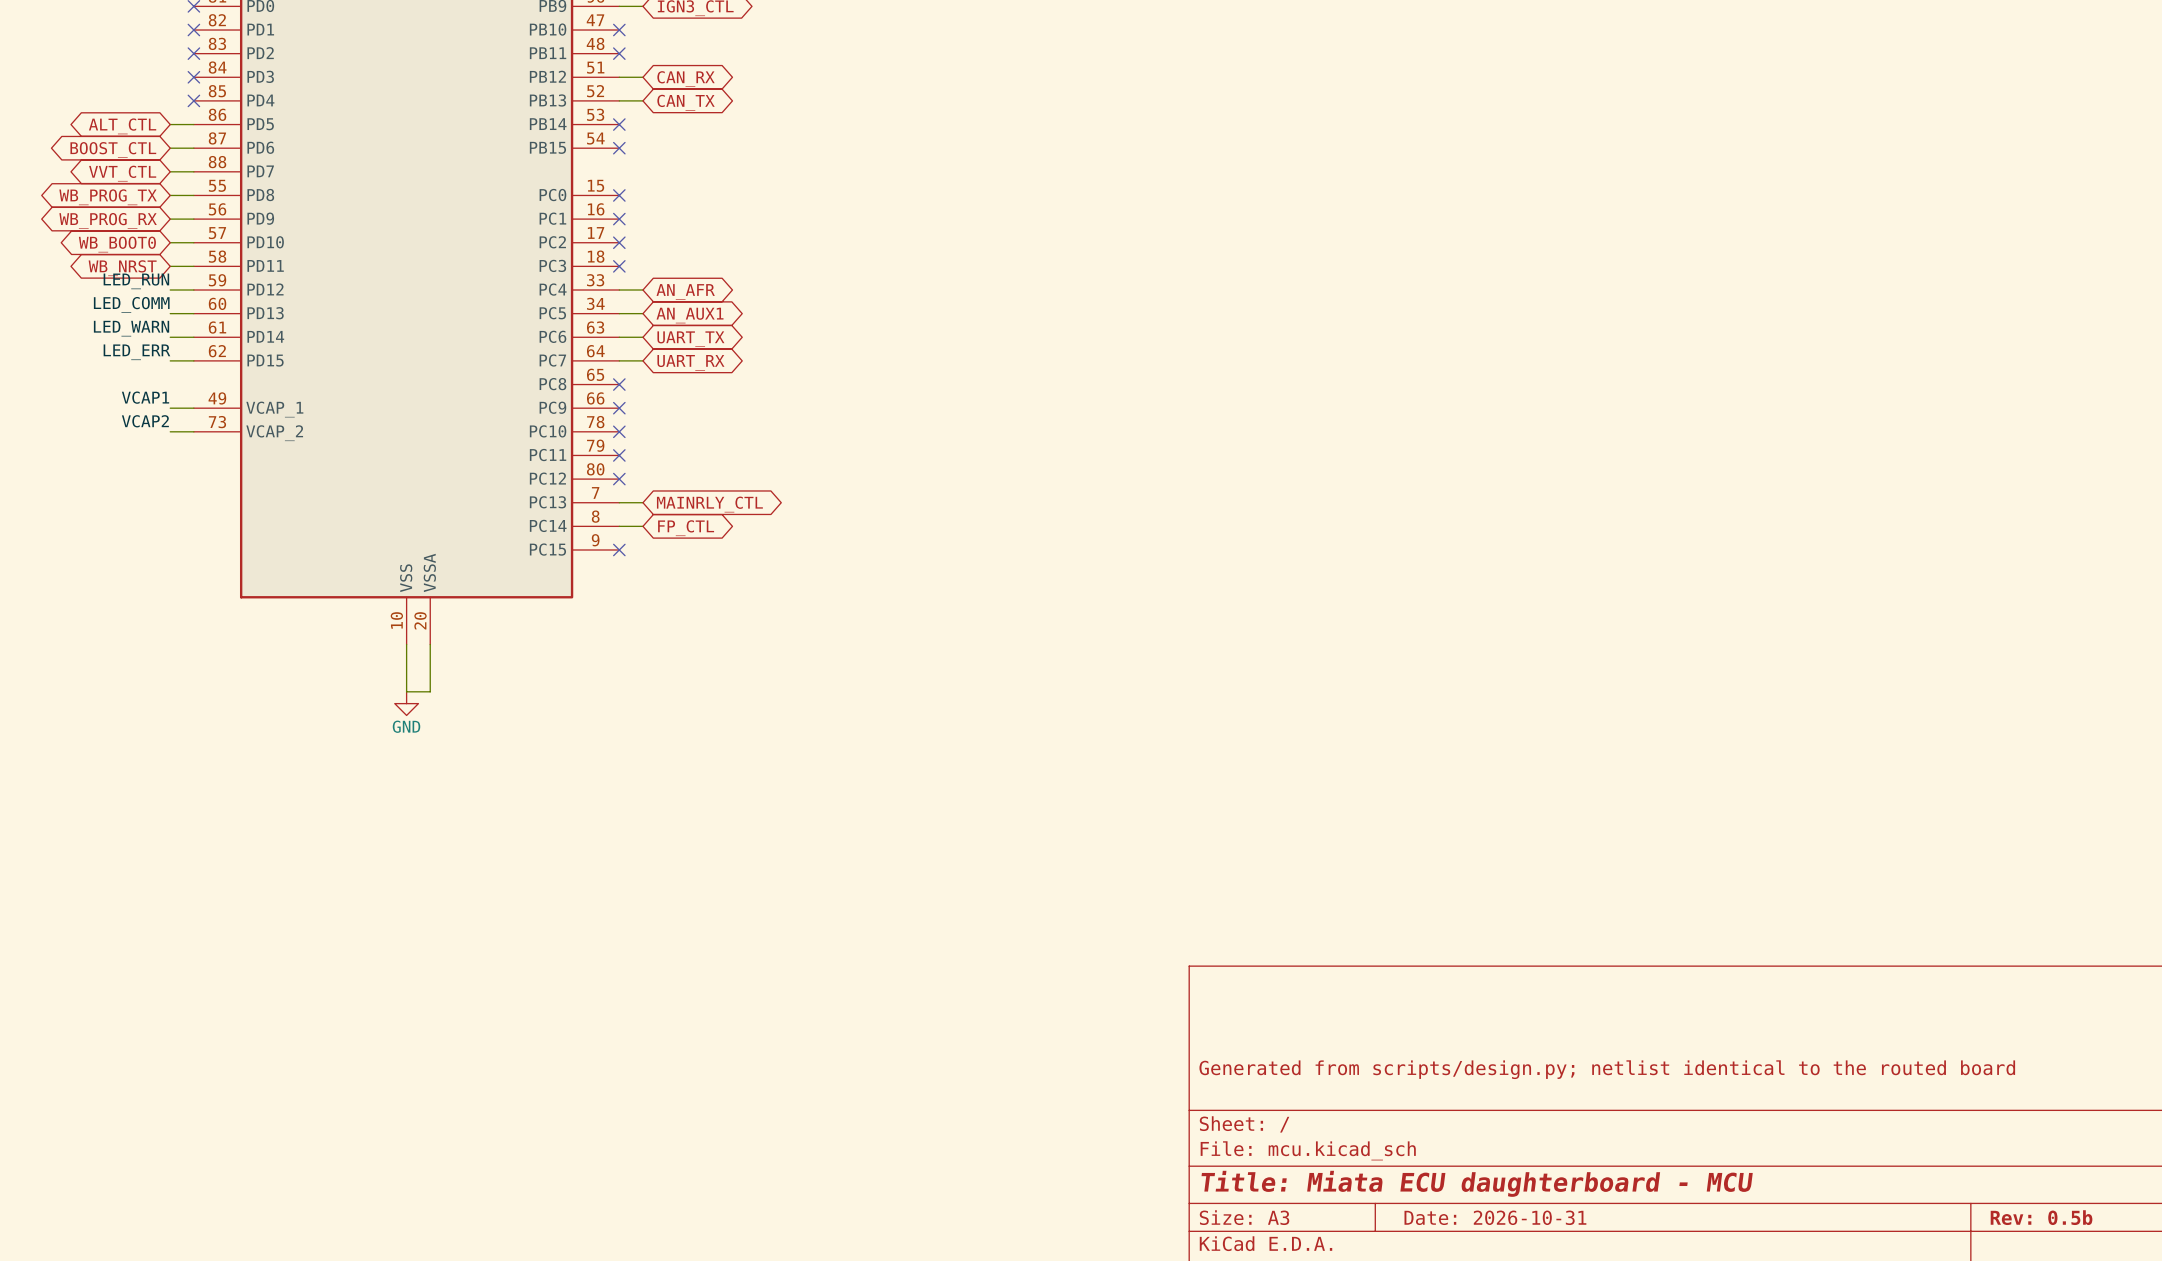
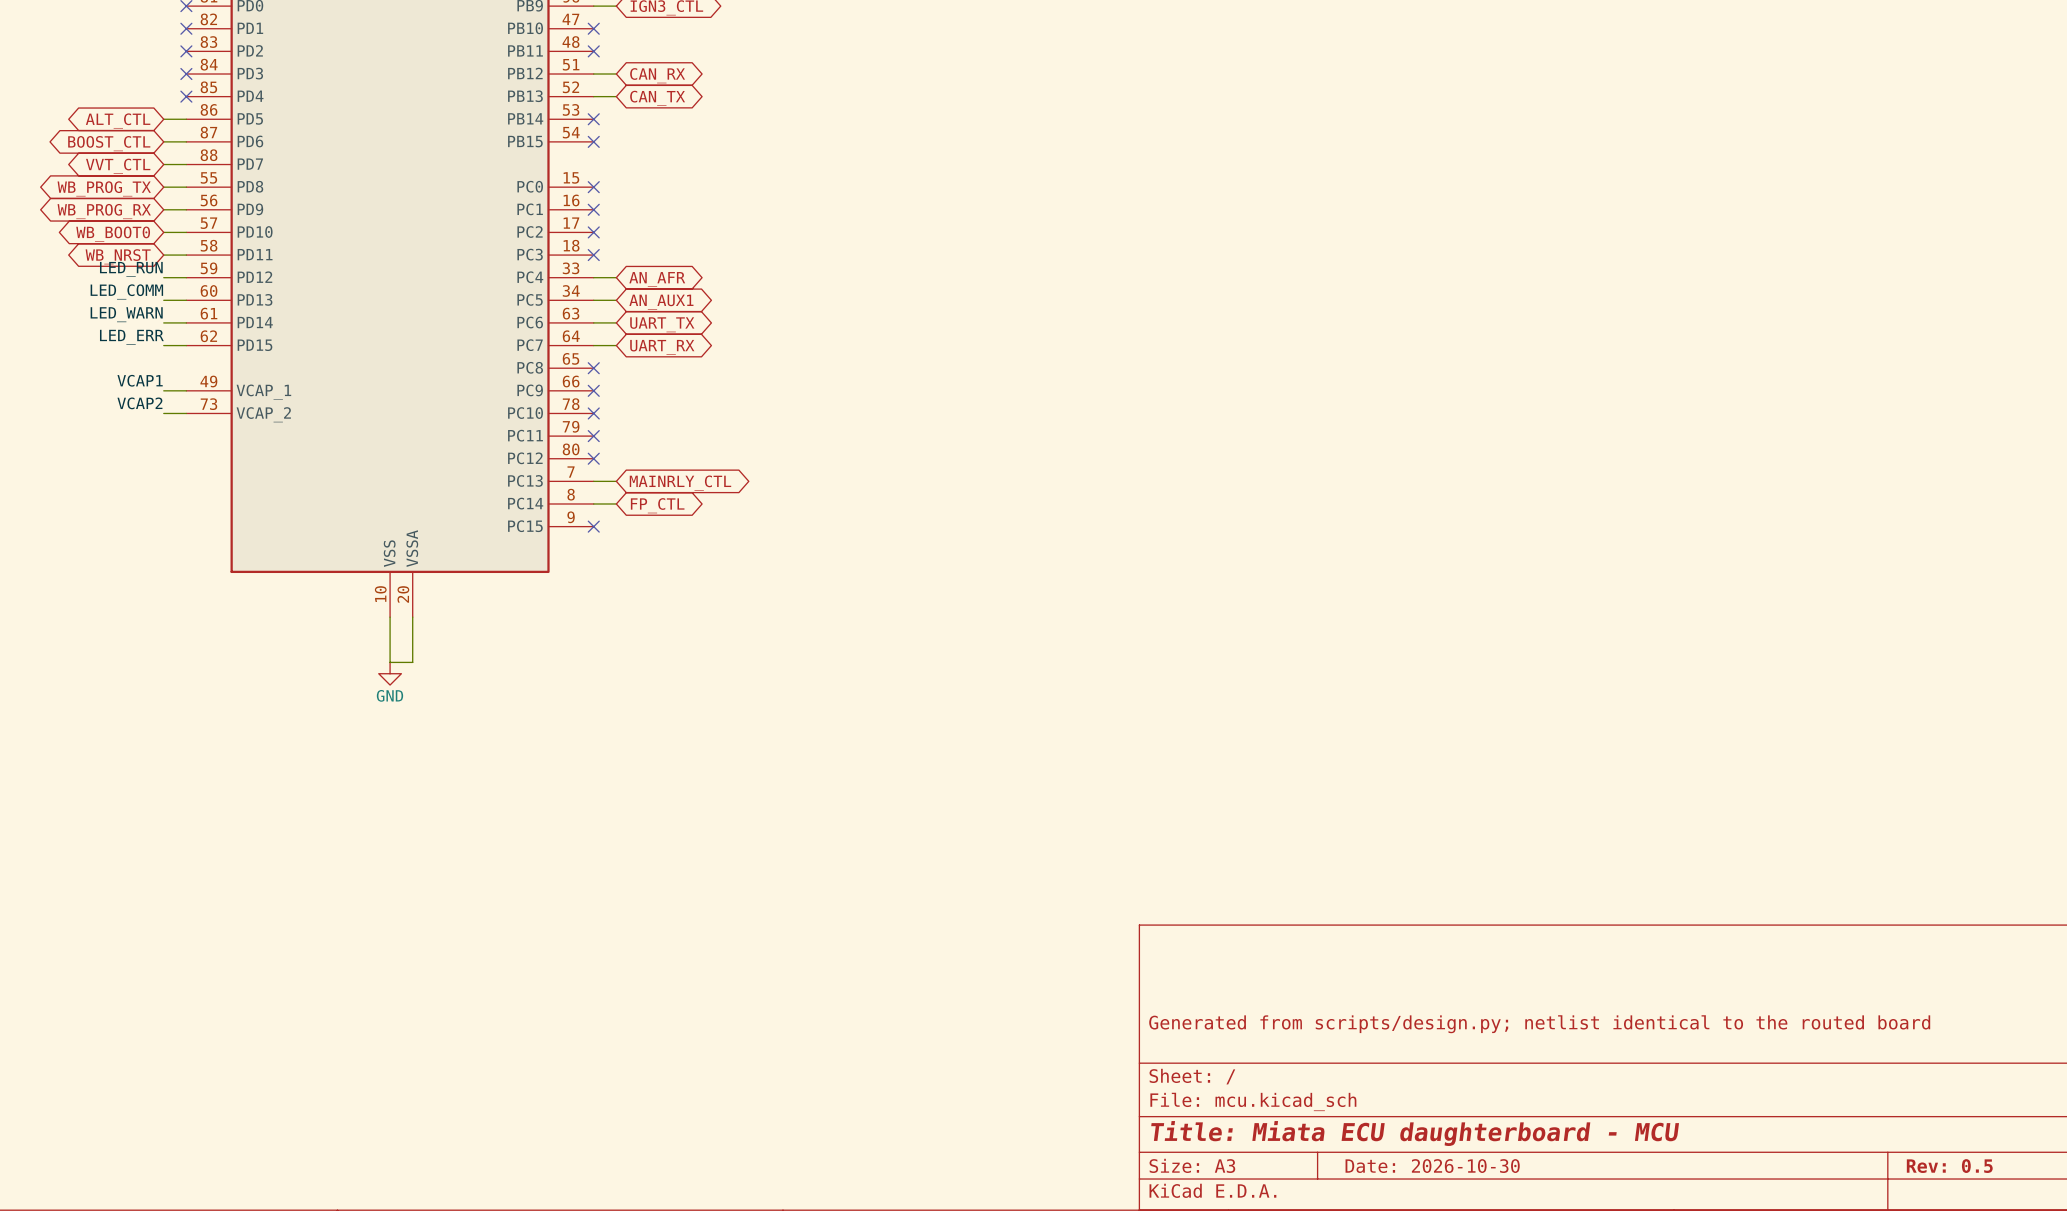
title block: Date: 2026-10-31 (1495, 1217) -> Date: 2026-10-30 (1432, 1166)
title block: Rev: 0.5b (2041, 1217) -> Rev: 0.5 (1949, 1166)

